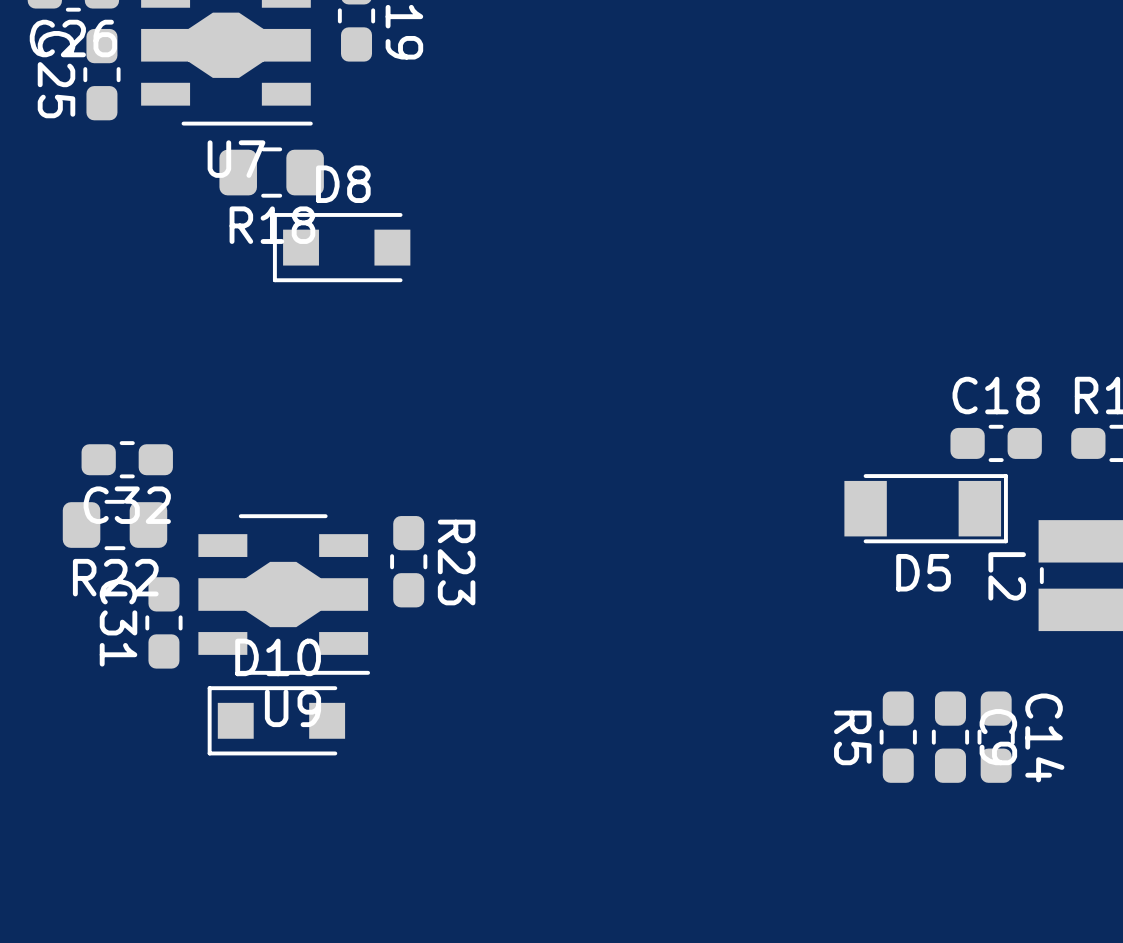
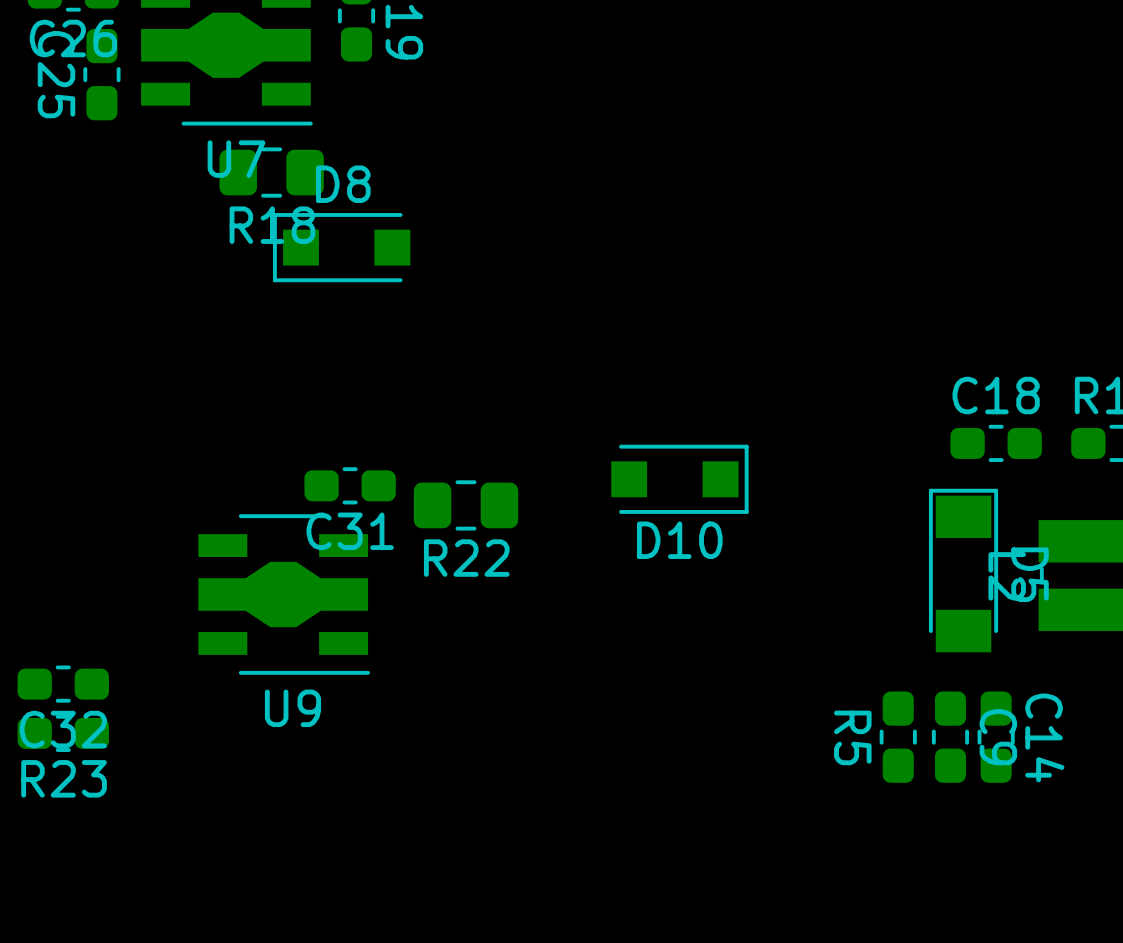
C32 position: (127, 459) -> (63, 684)
D5 rotation: 0° (926, 508) -> 90° counterclockwise (963, 570)
R22 position: (115, 525) -> (465, 505)
R23 rotation: 0° (408, 561) -> 90° clockwise (63, 733)
R23 position: (408, 561) -> (63, 733)
C31 name position: C31 (118, 622) -> C31 (350, 531)
C31 rotation: 0° (163, 622) -> 90° clockwise (350, 485)
C31 position: (163, 622) -> (350, 485)
D10 rotation: 0° (276, 720) -> 180° (679, 479)
D10 position: (276, 720) -> (679, 479)

